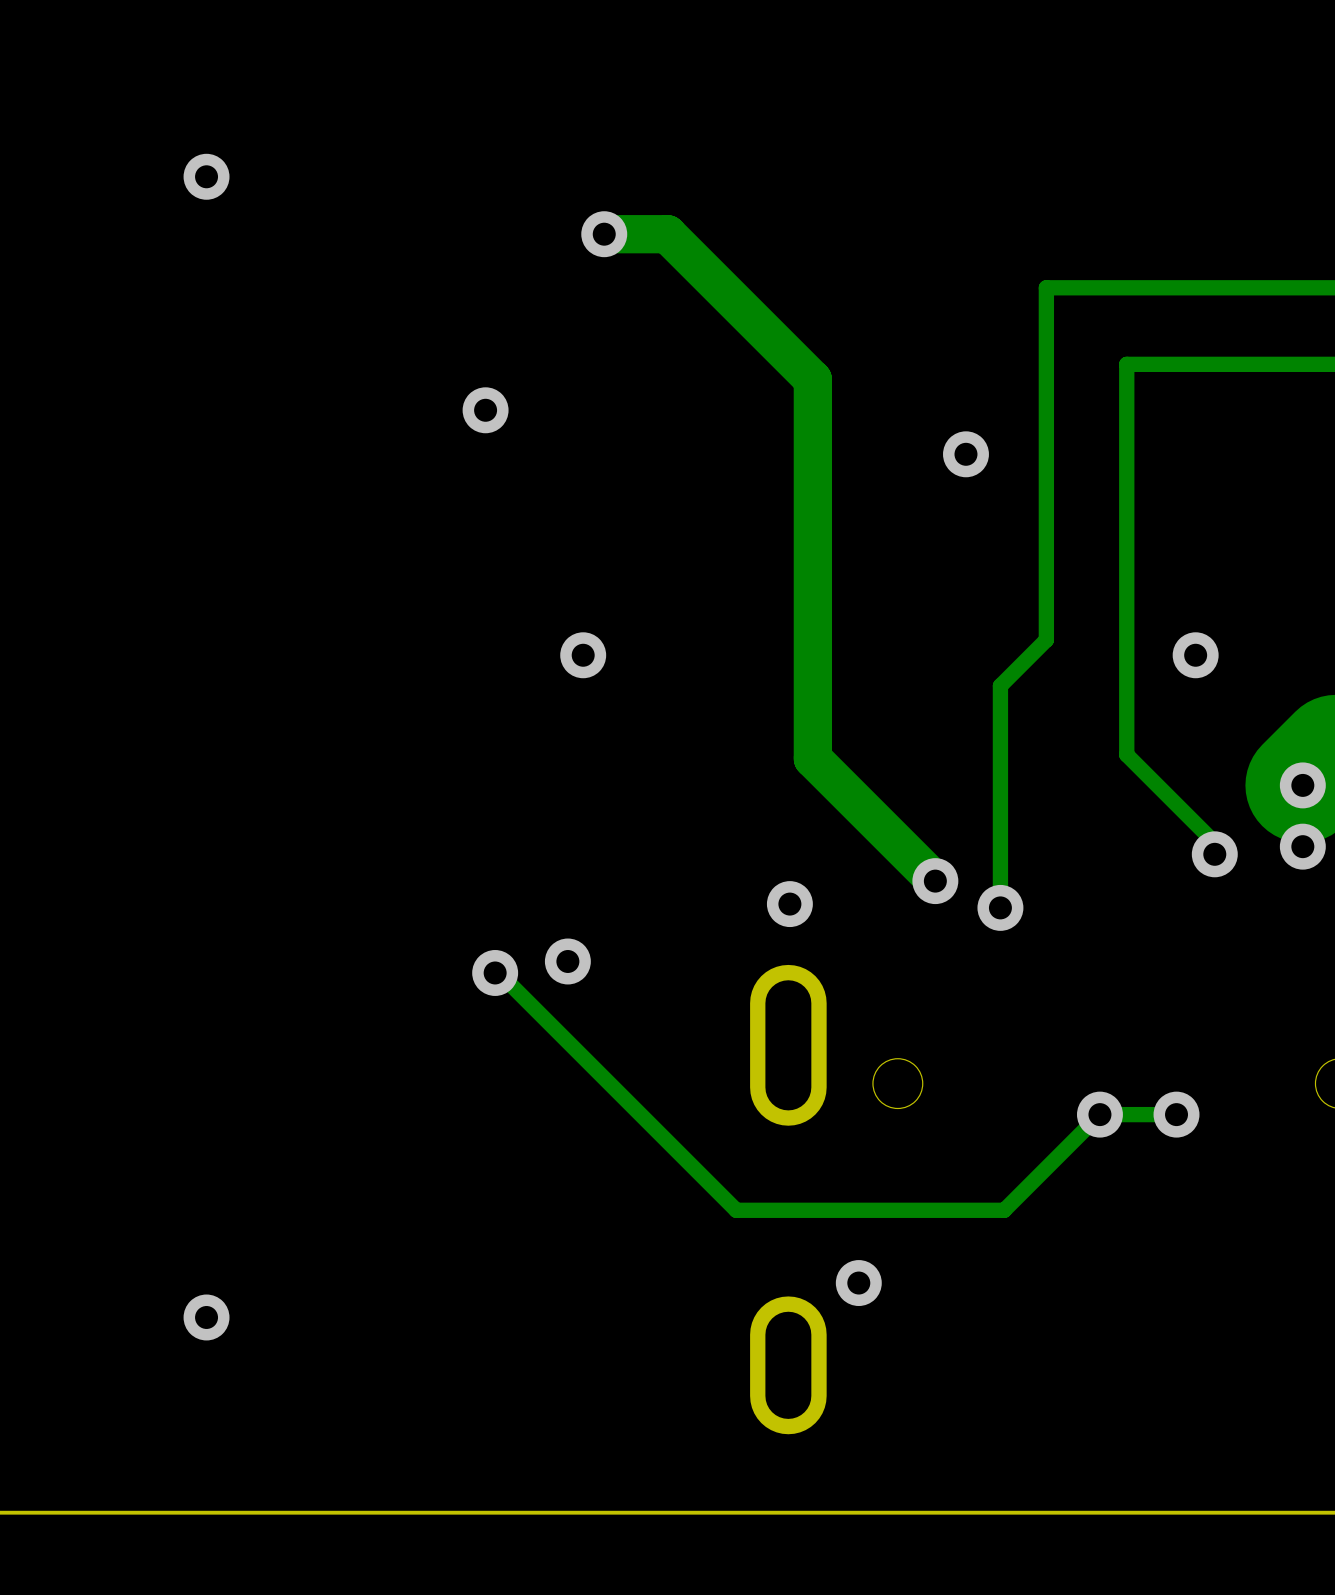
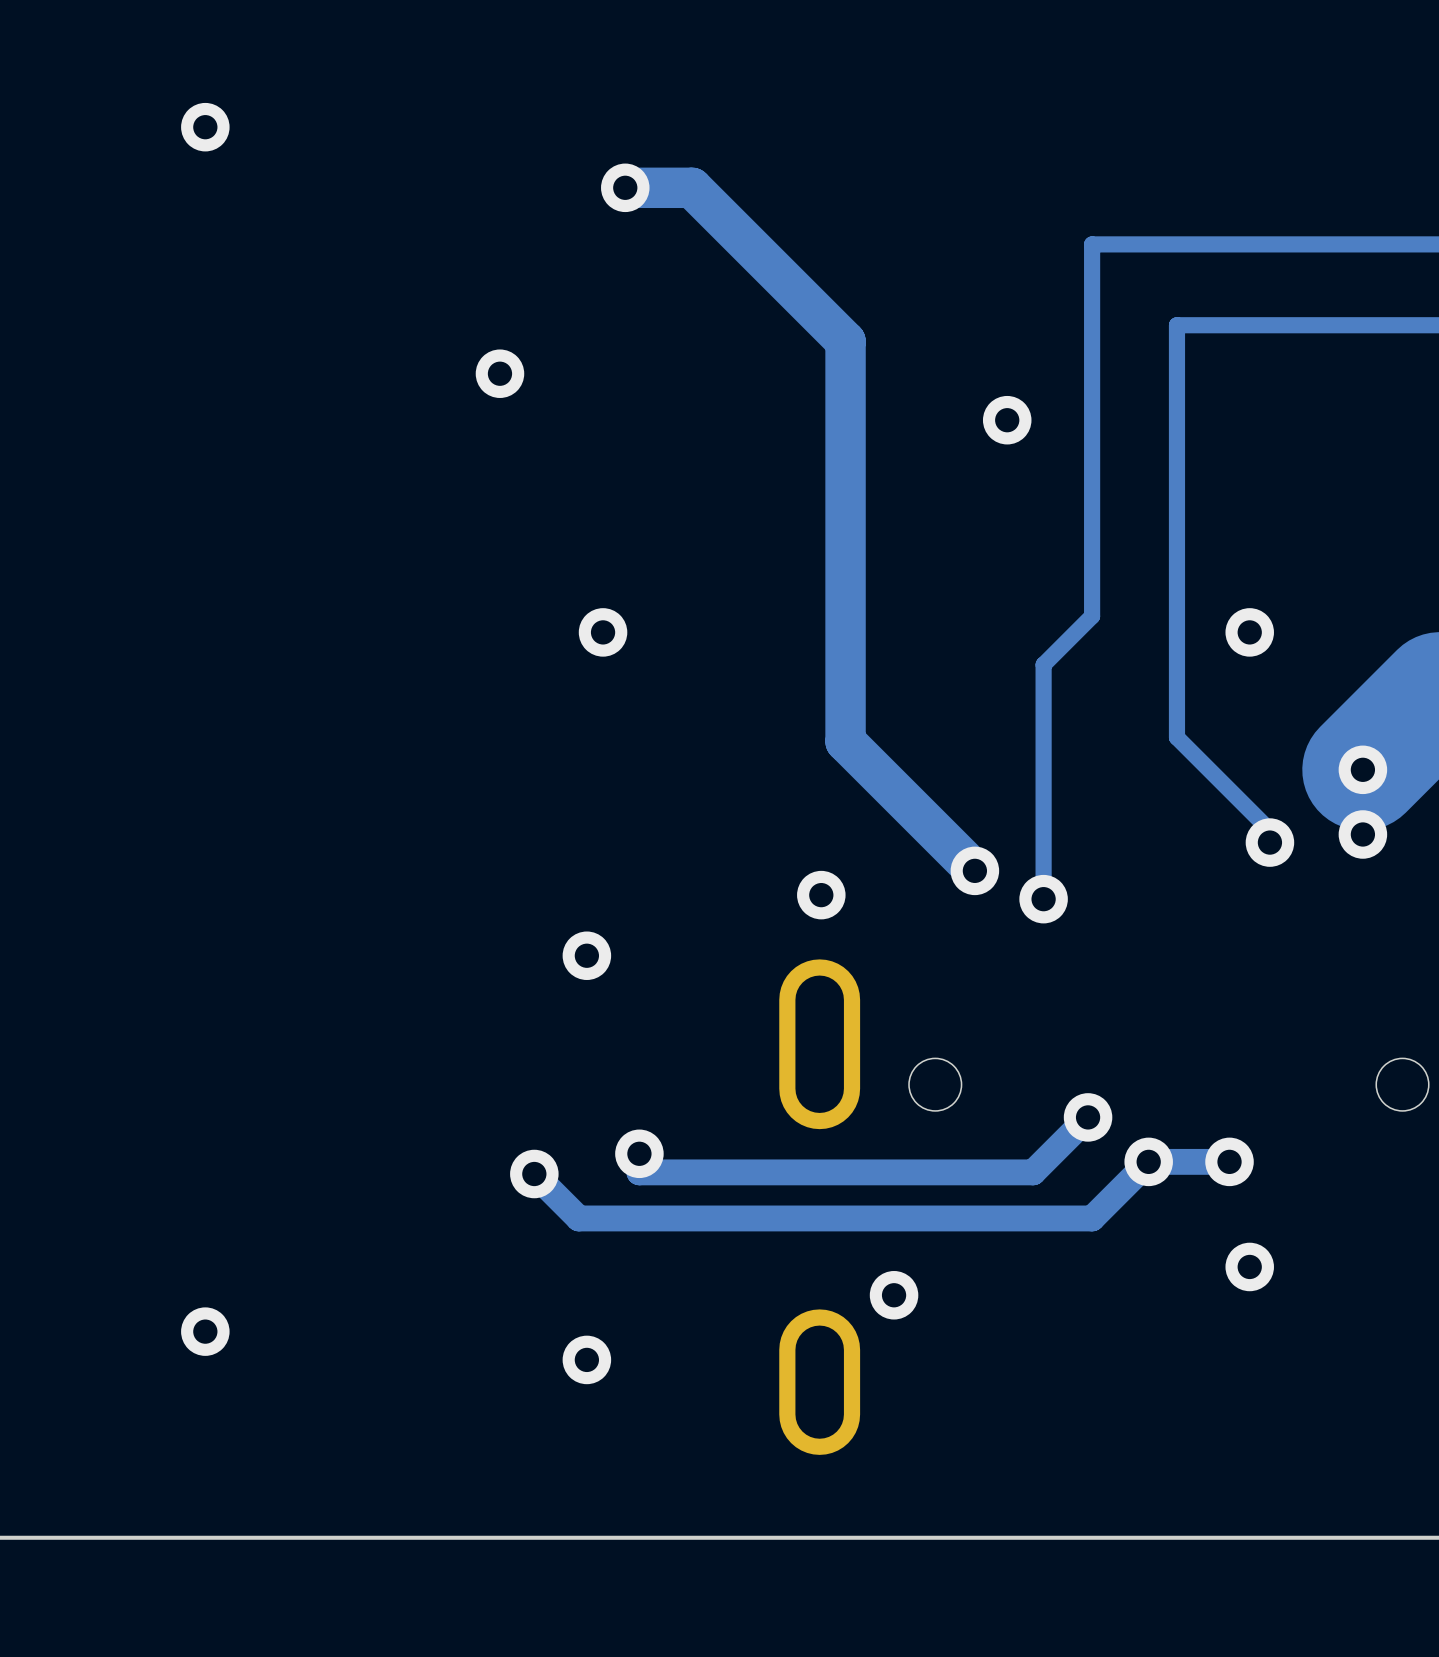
track: (495, 972) (498, 972) (736, 1210) -> (534, 1174) (578, 1218) (764, 1218)
via: (495, 972) -> none
track: none -> (1088, 1117) (1033, 1172) (639, 1172) (639, 1153)
via: none -> (1088, 1117)
via position: (1099, 1114) -> (1148, 1161)
track: (1176, 1114) (1099, 1114) (1004, 1210) -> (1229, 1161) (1148, 1161) (1092, 1218) (1047, 1218)
via position: (1176, 1114) -> (1229, 1161)
via: none -> (639, 1153)
via: none -> (534, 1174)
track width: thin (1004, 1210) (736, 1210) -> thick (1047, 1218) (764, 1218)
via: none -> (1249, 1266)
via: none -> (586, 1359)

